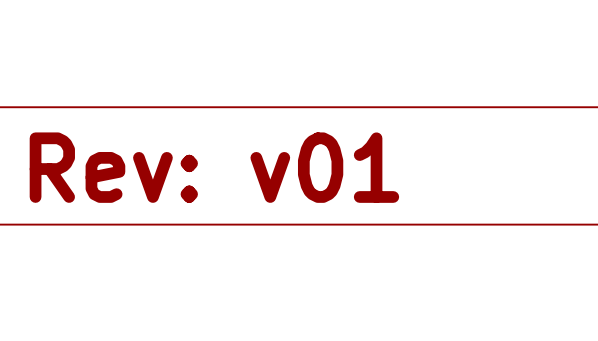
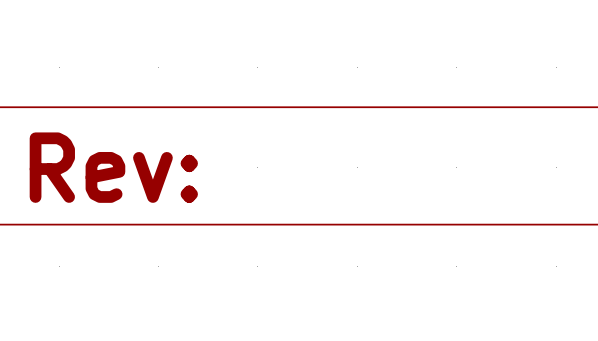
title block: Rev: v01 (214, 167) -> Rev: (113, 167)

